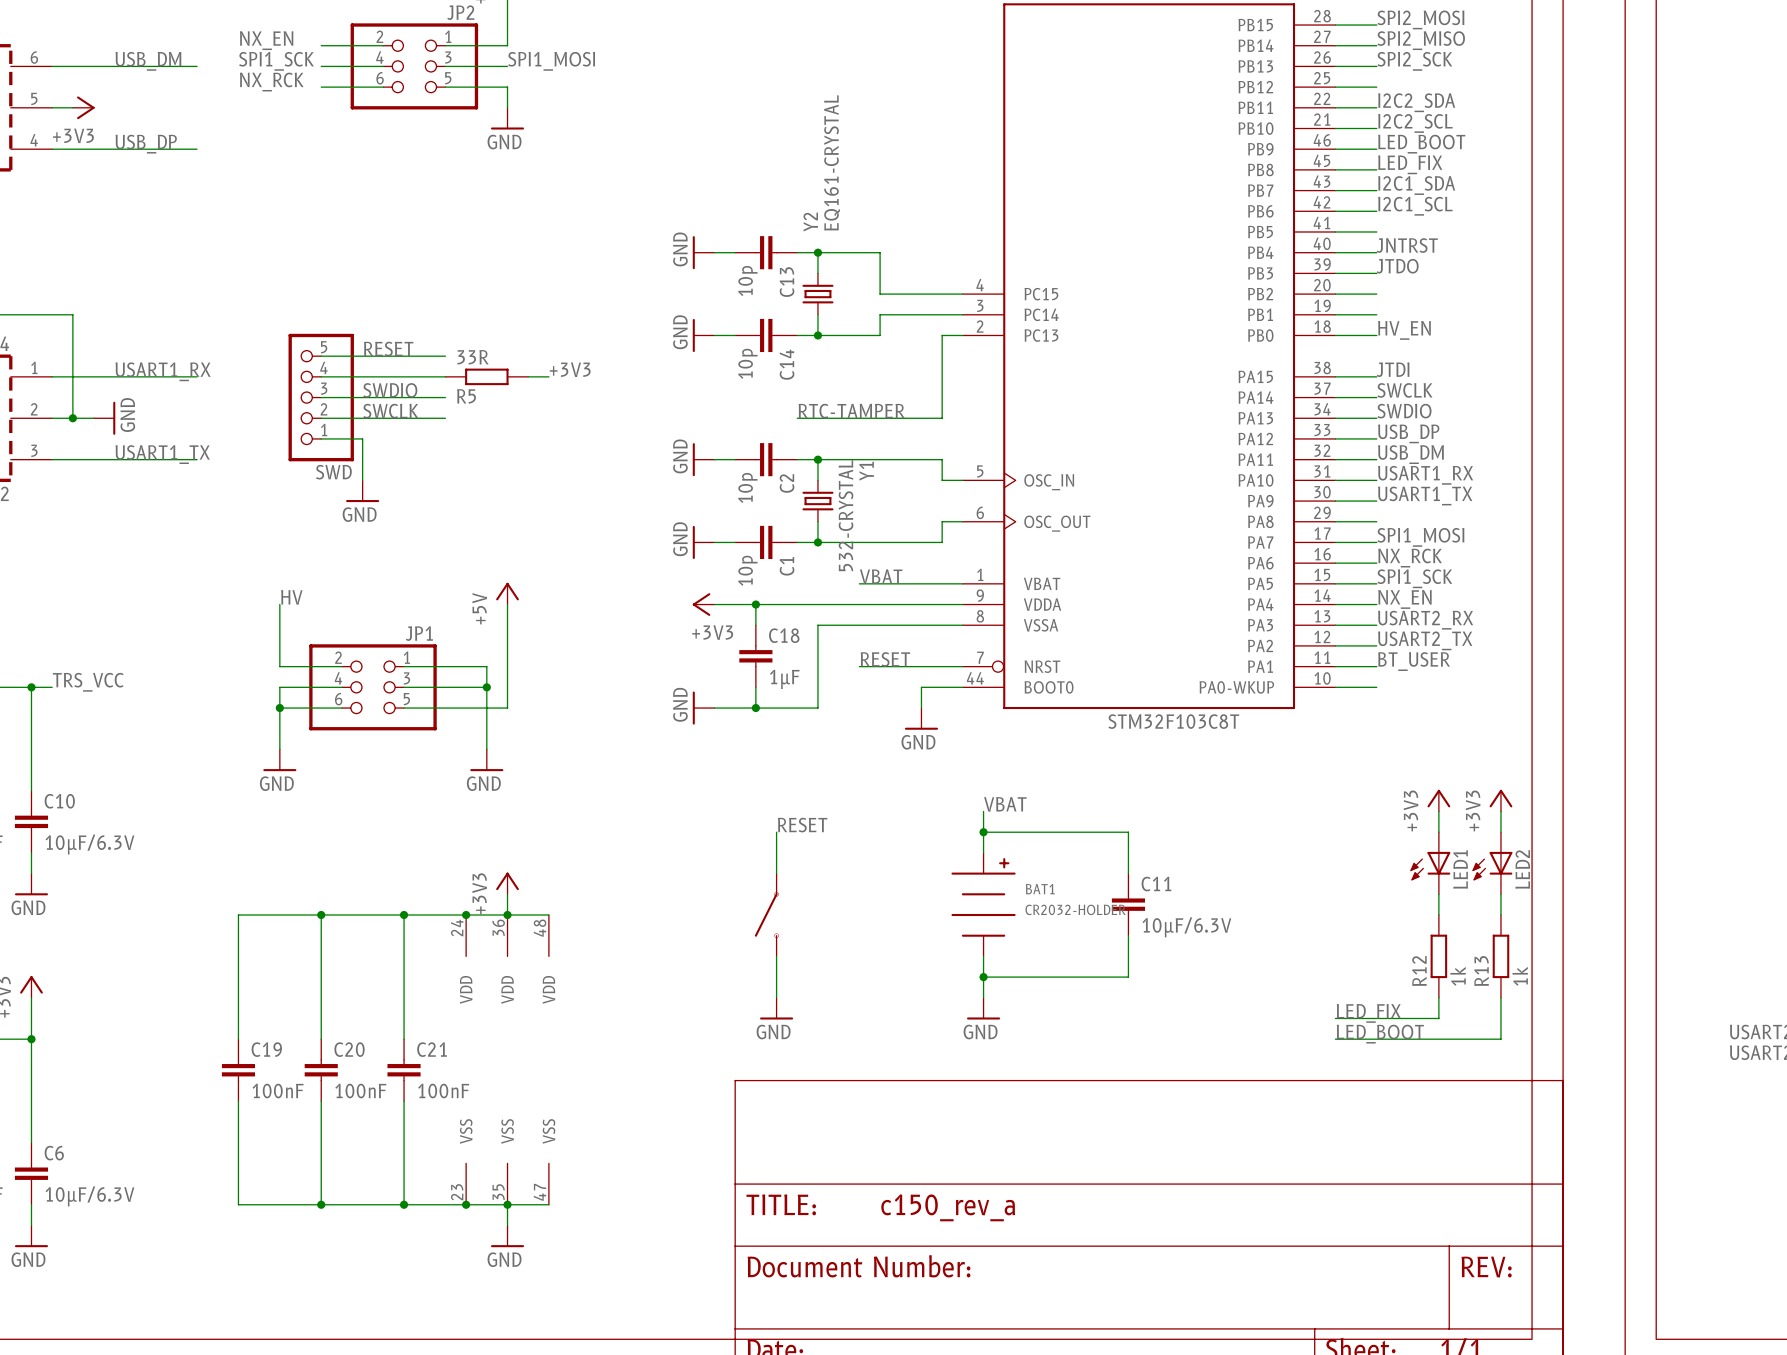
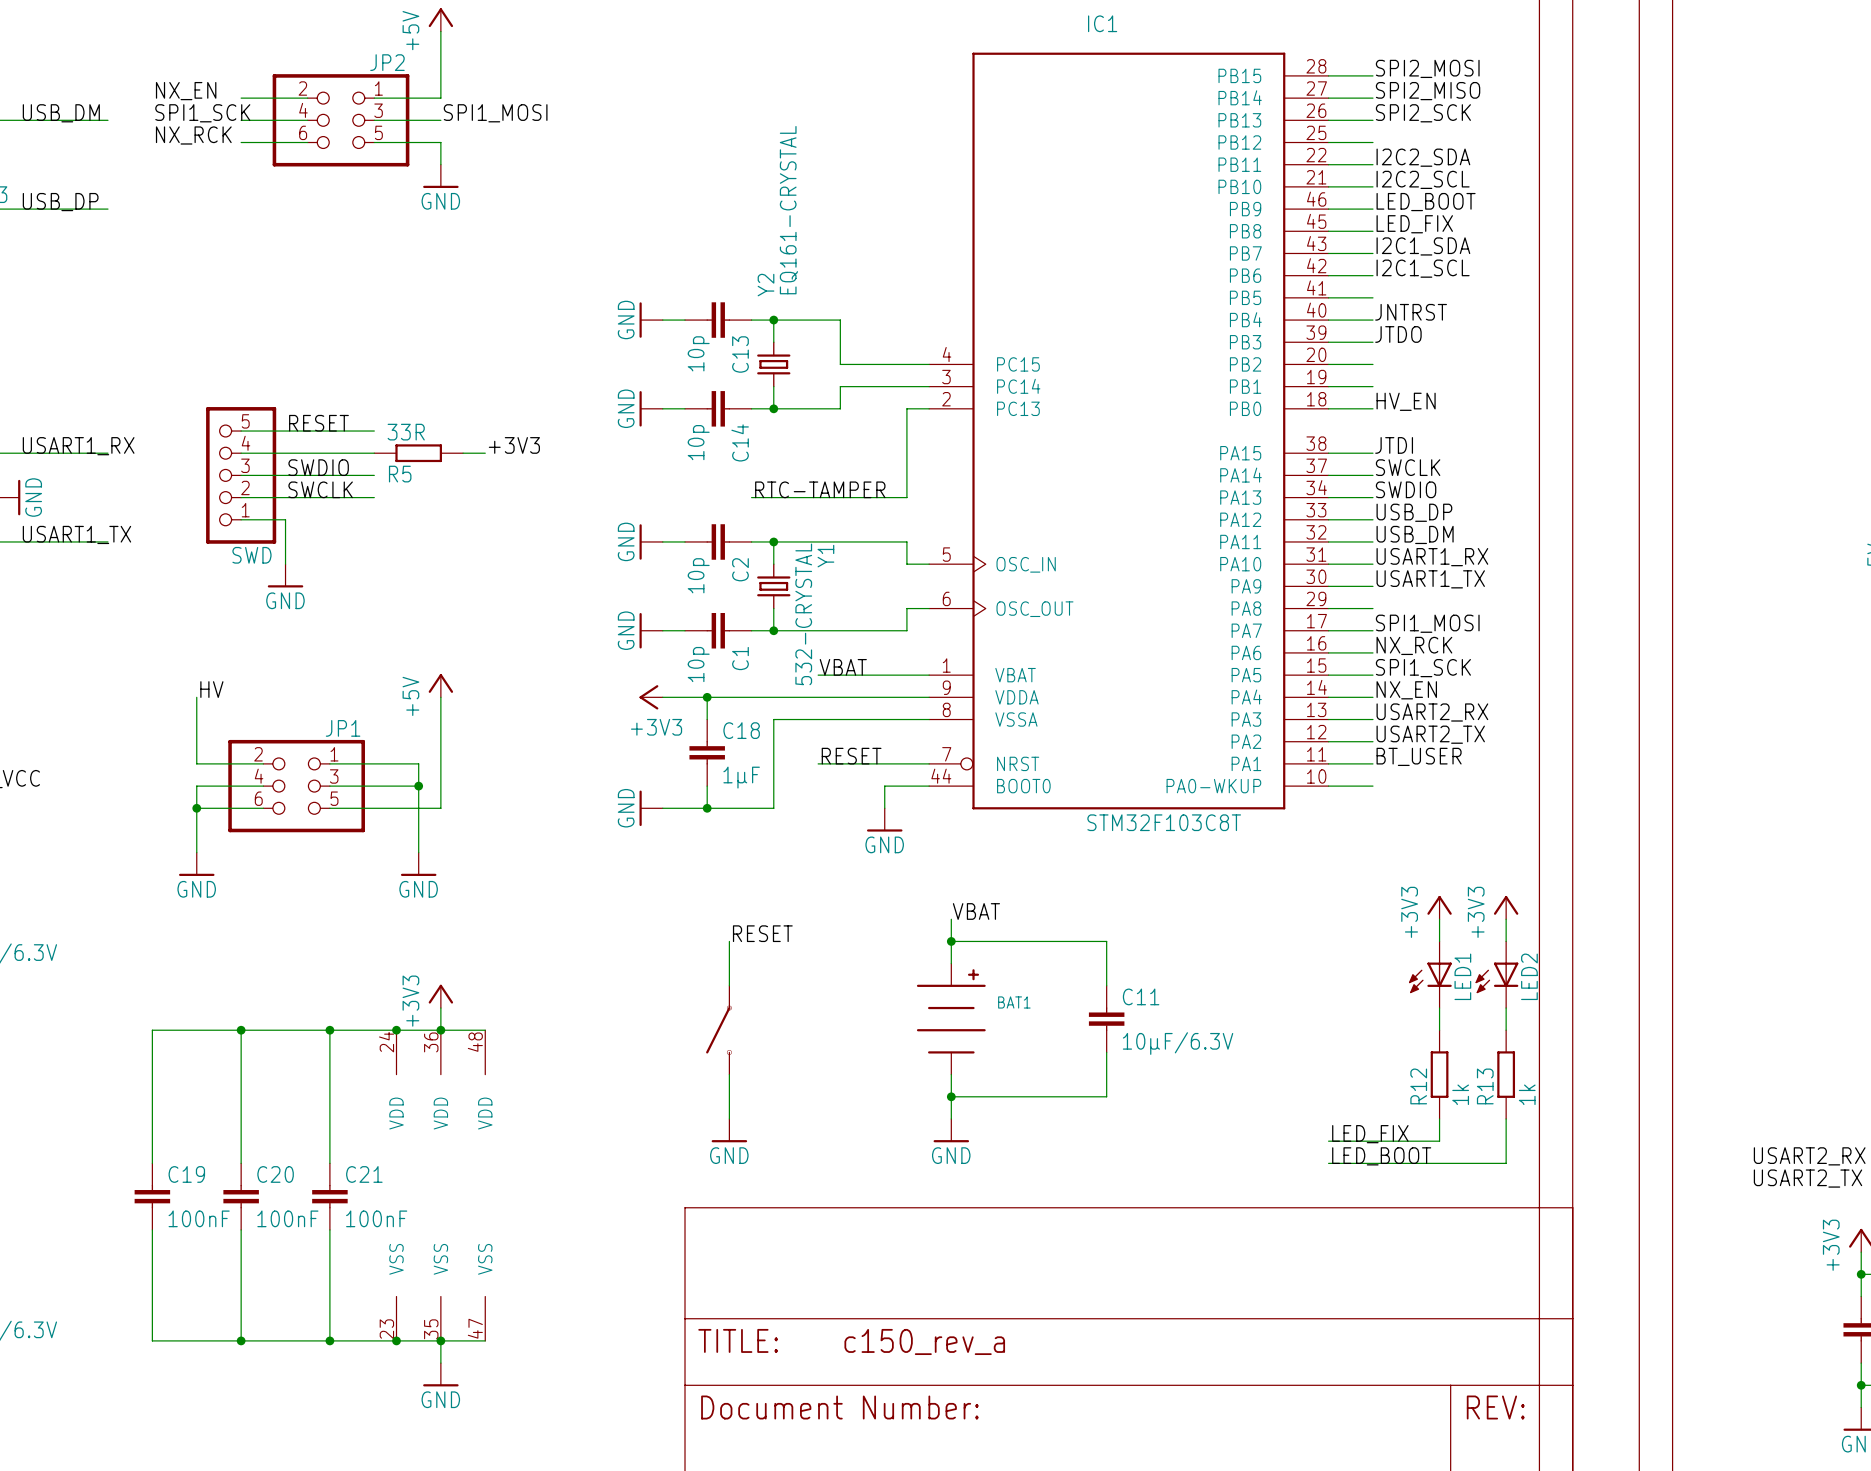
BAT1 value: CR2032-HOLDER (1075, 909) -> none

